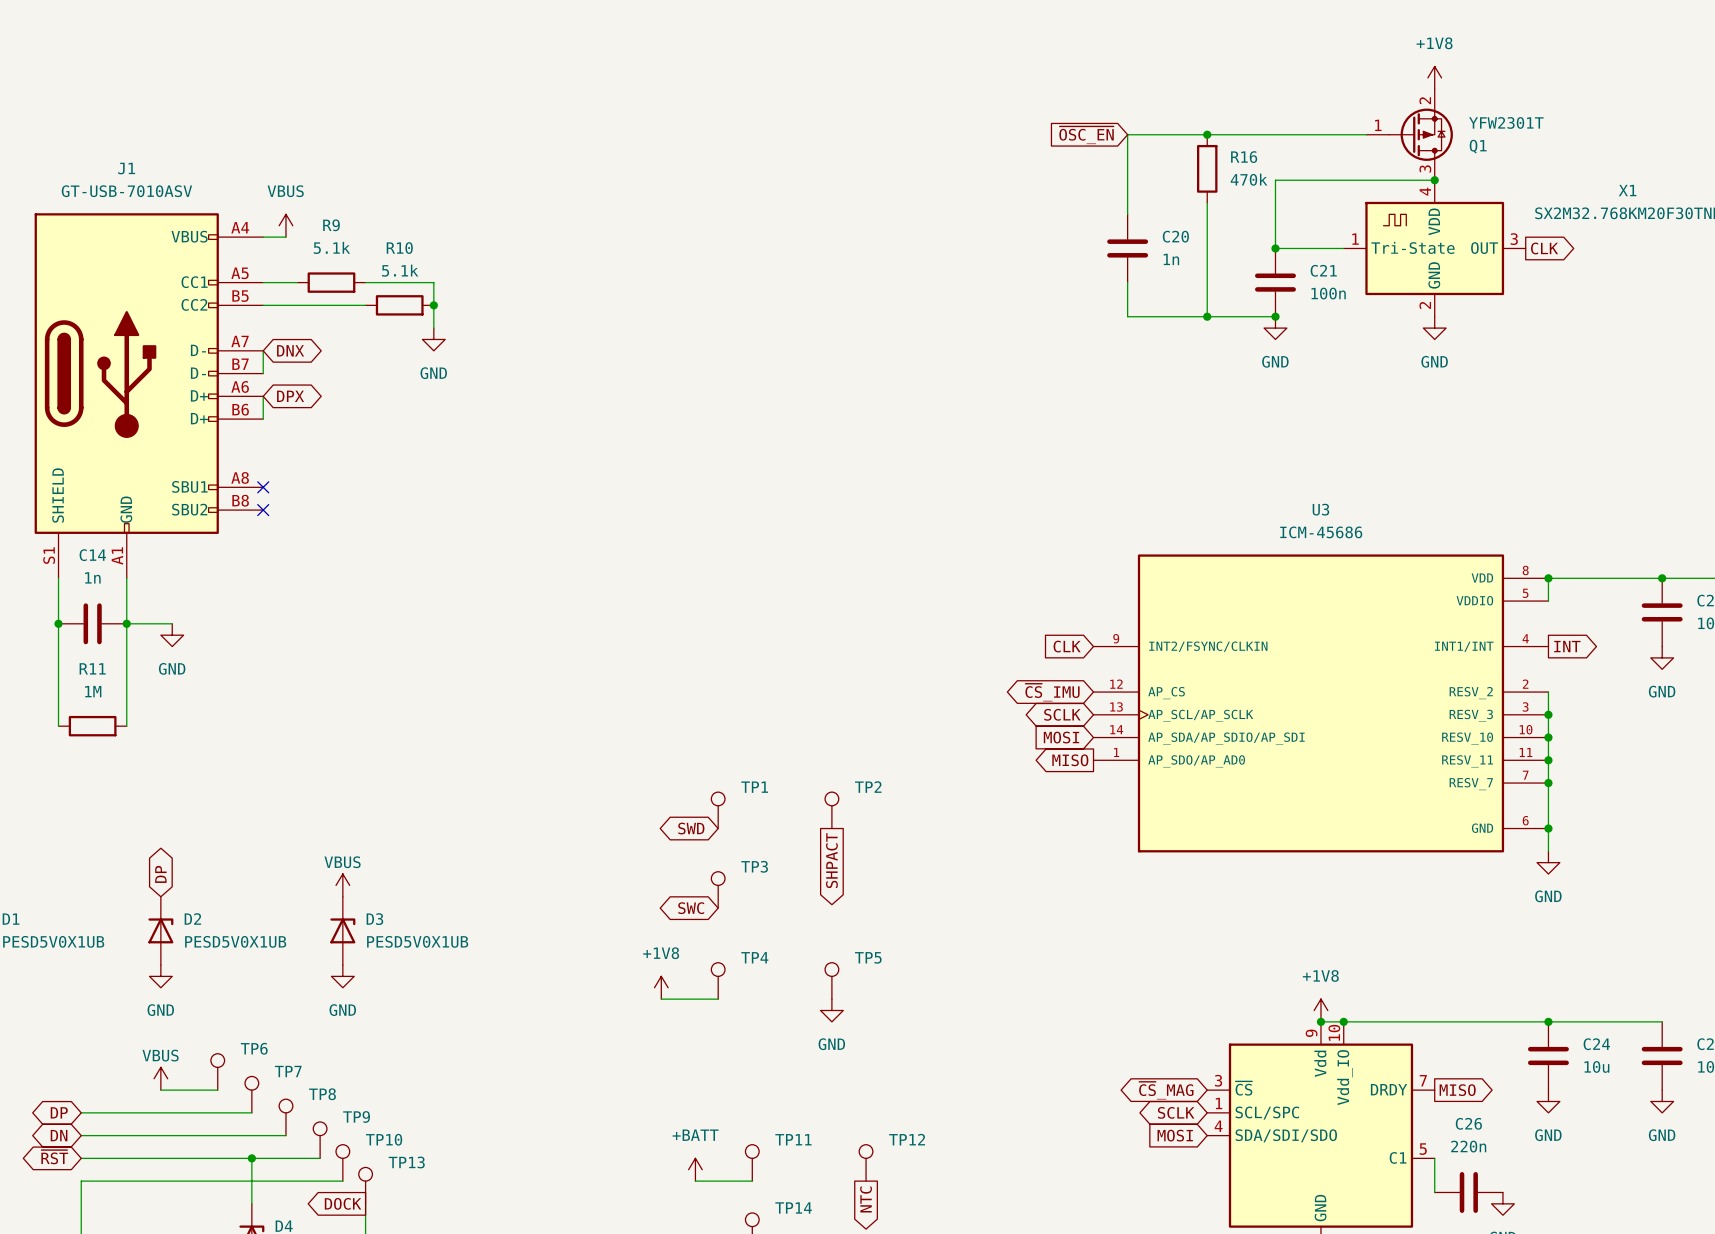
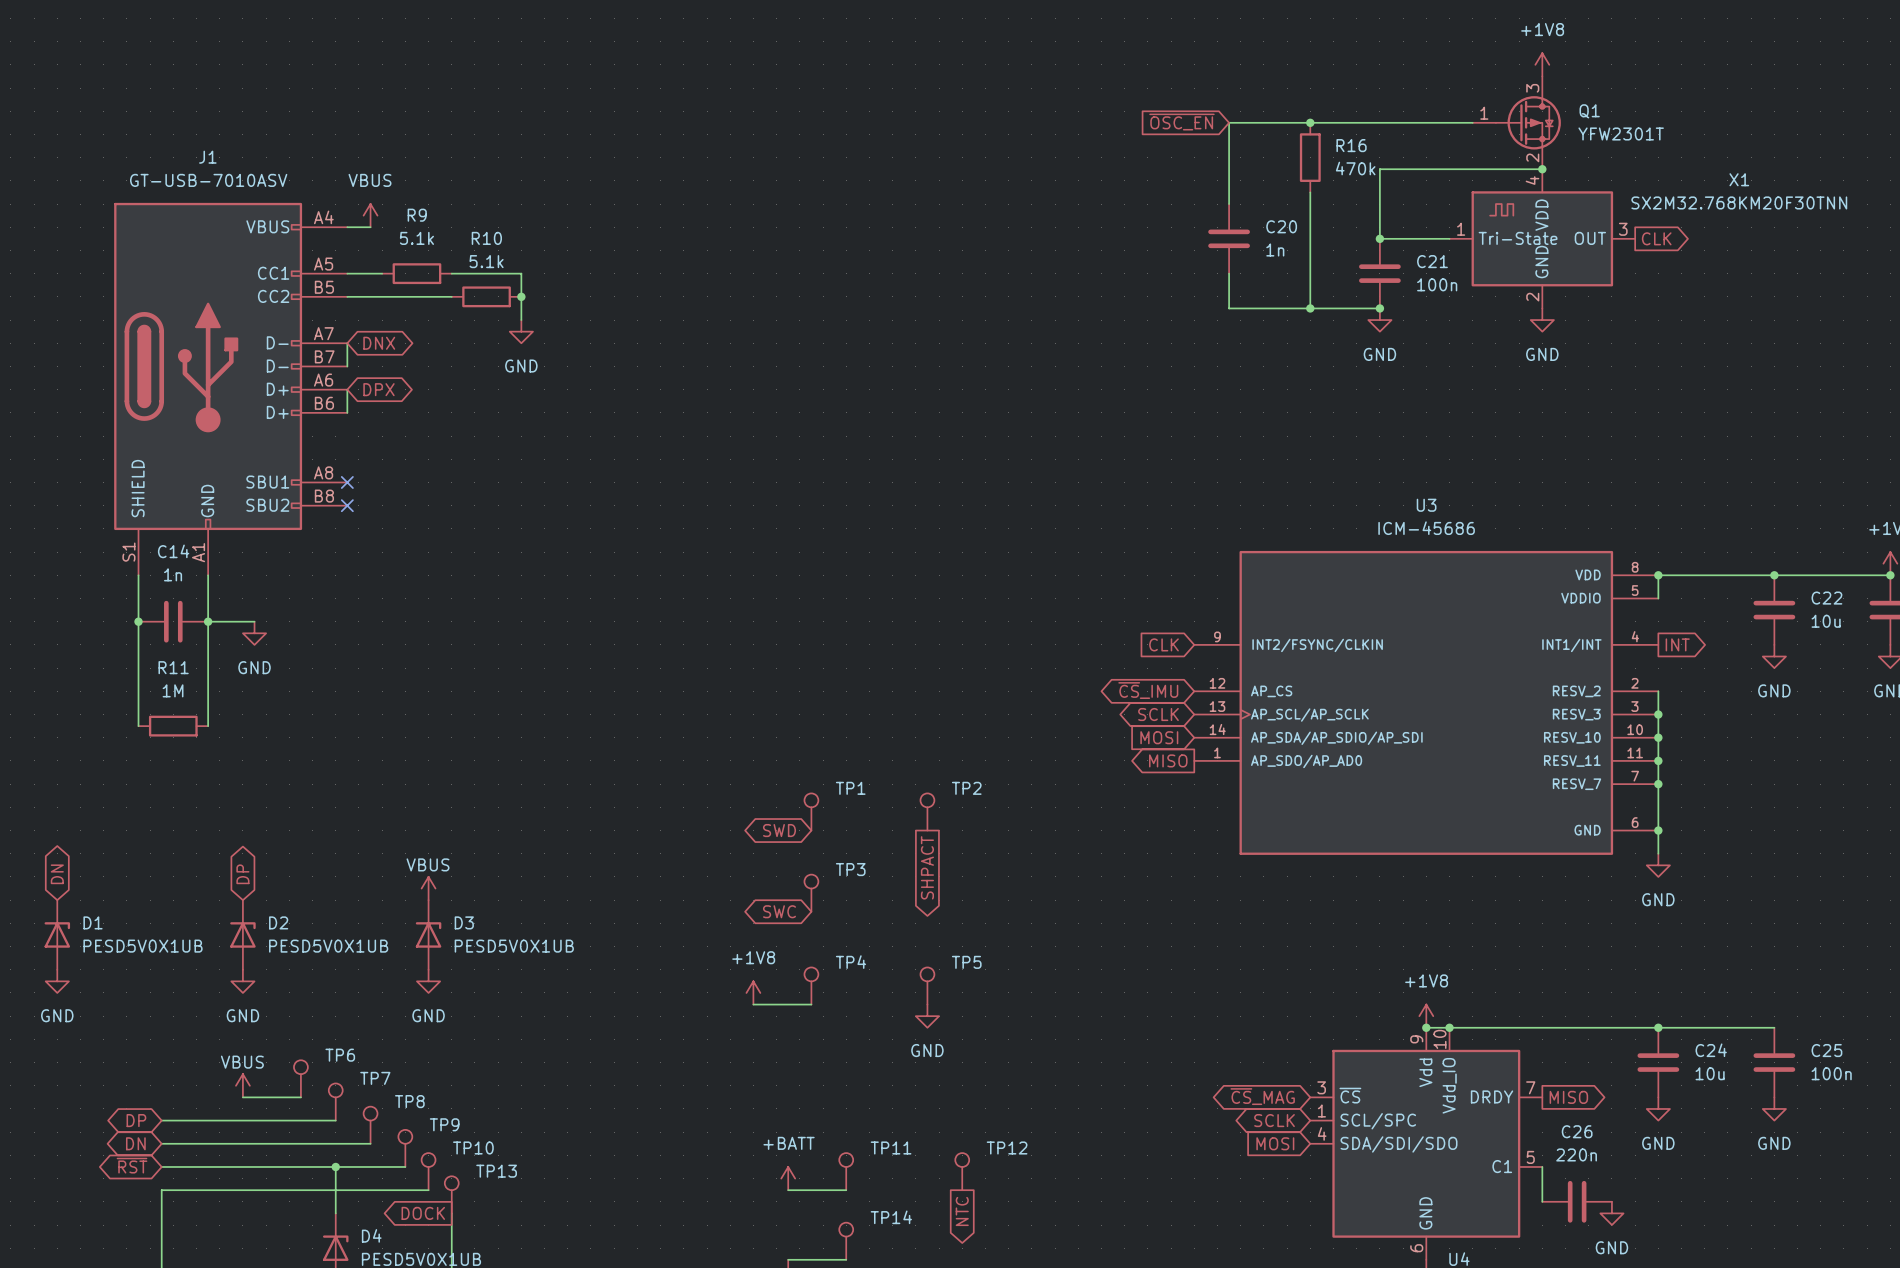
Q1 flip: as is (1421, 134) -> up-down (1528, 122)

